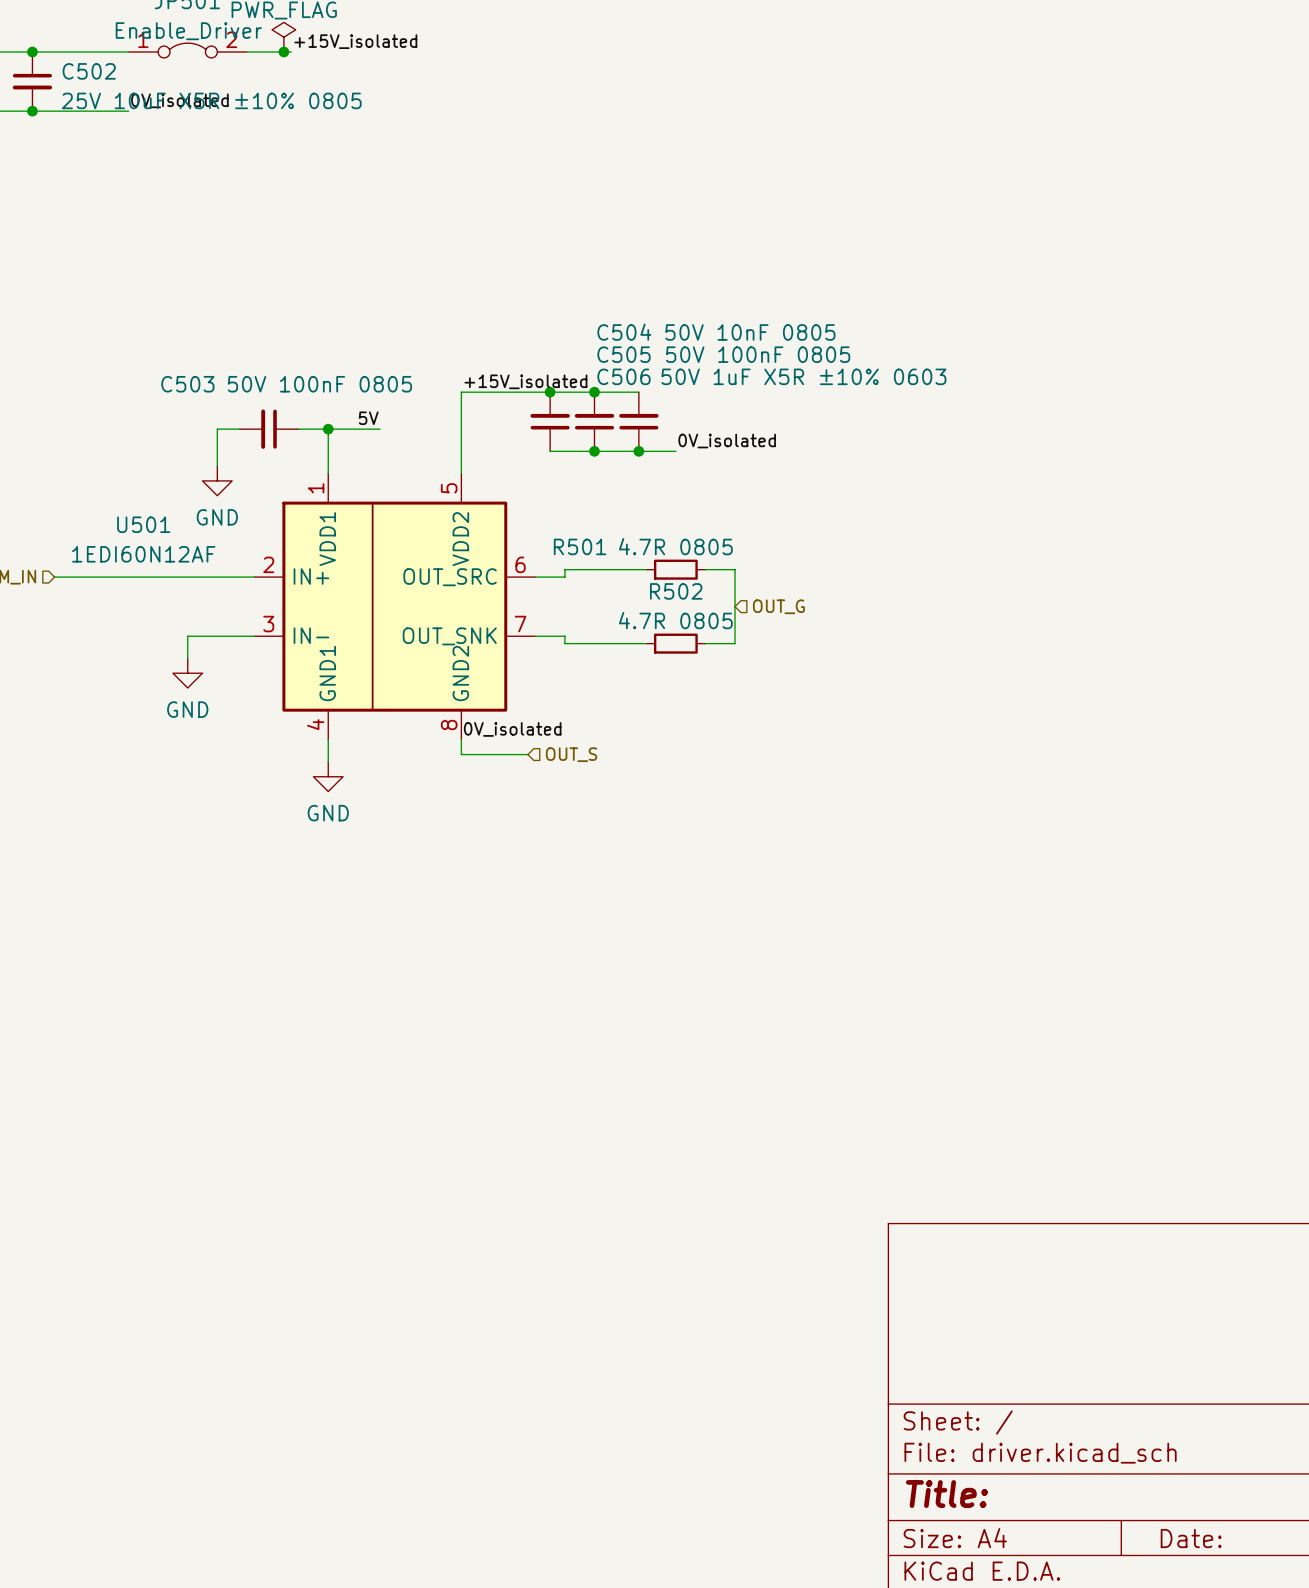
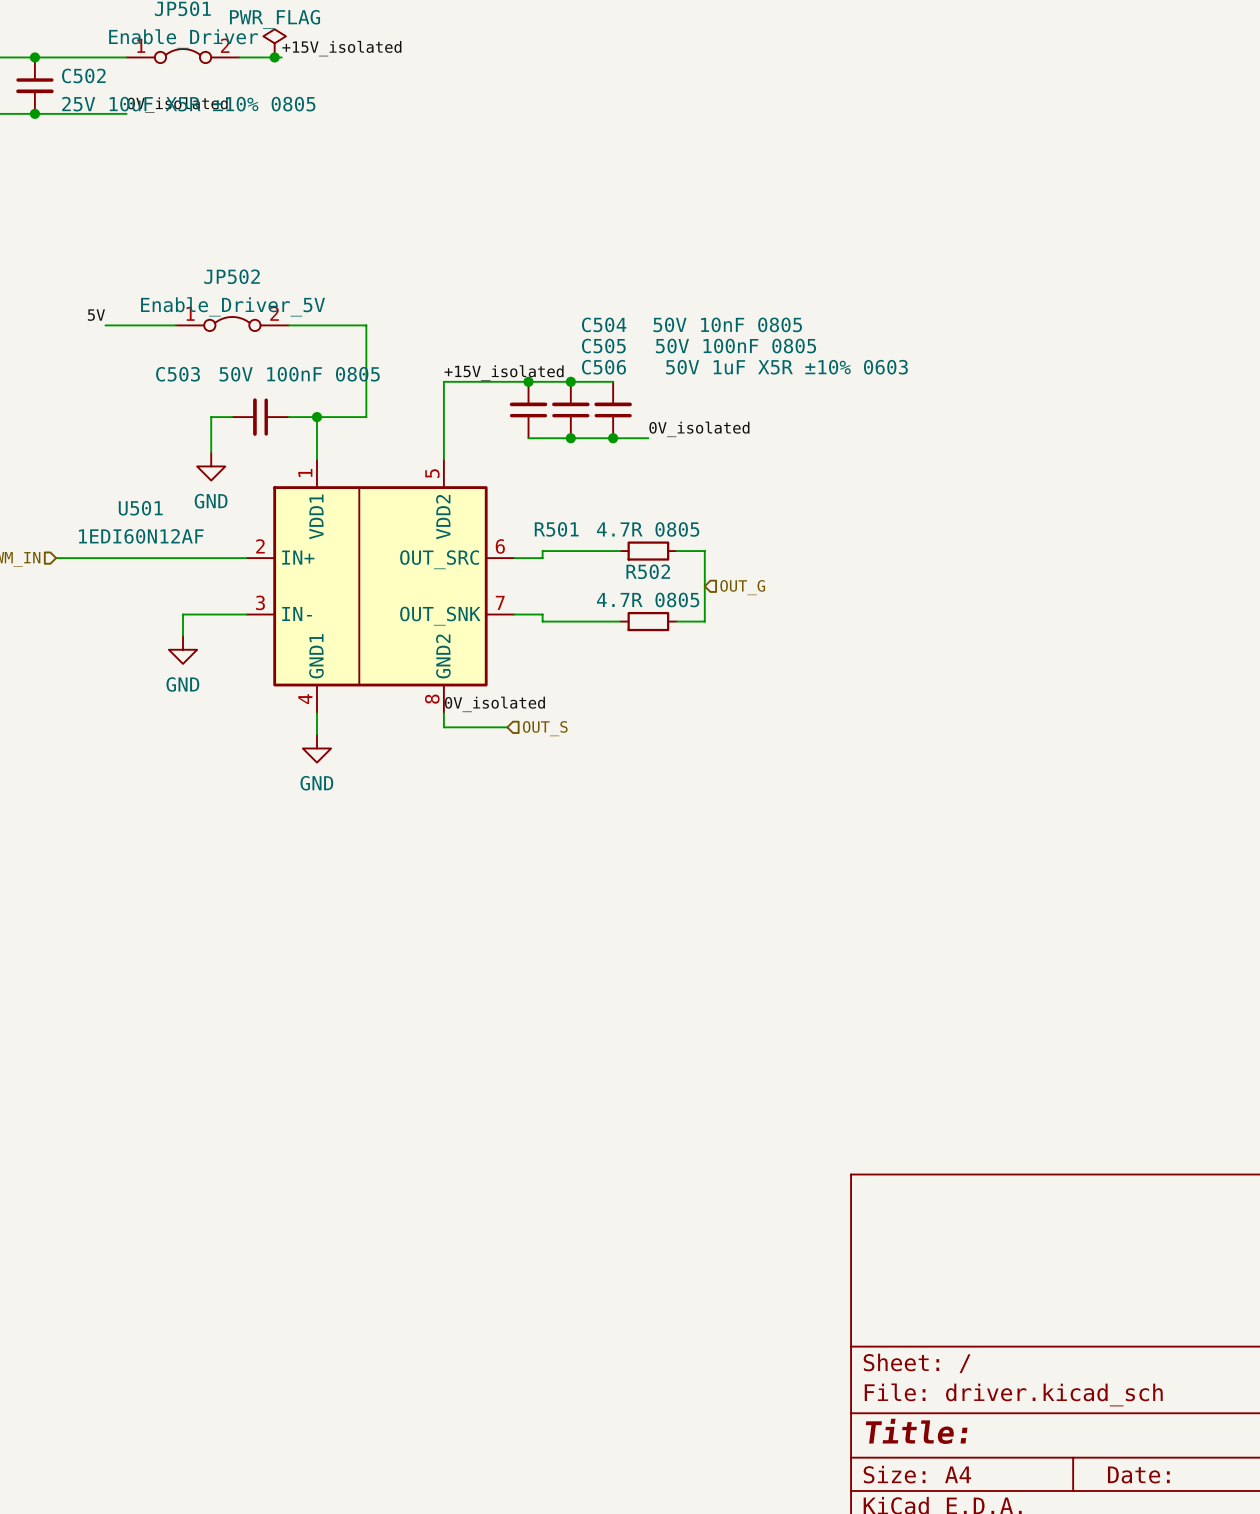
JP502: none -> Enable_Driver_5V (232, 324)
wire: none -> (105, 325) (175, 325)
wire: none -> (288, 325) (366, 325) (366, 417)
label position: 5V (368, 418) -> 5V (96, 315)

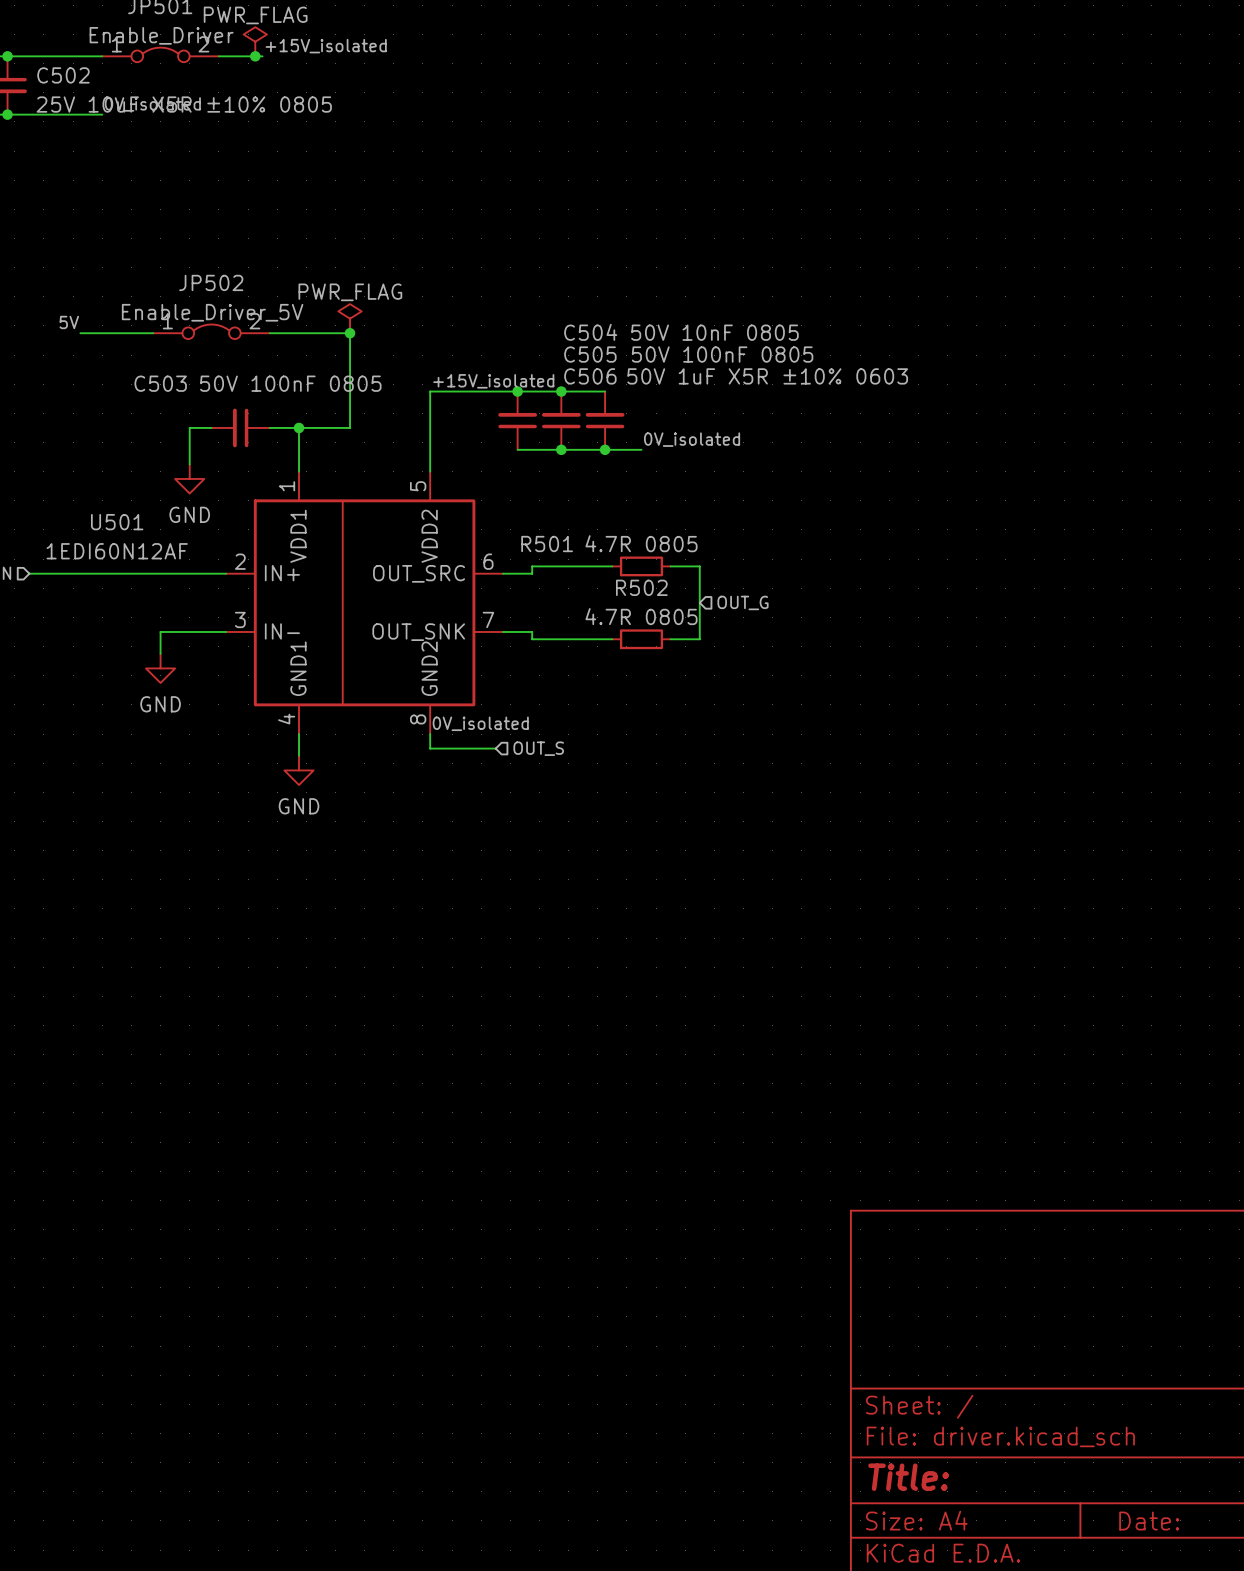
power symbol: none -> PWR_FLAG (350, 318)
junction: none -> (350, 333)

